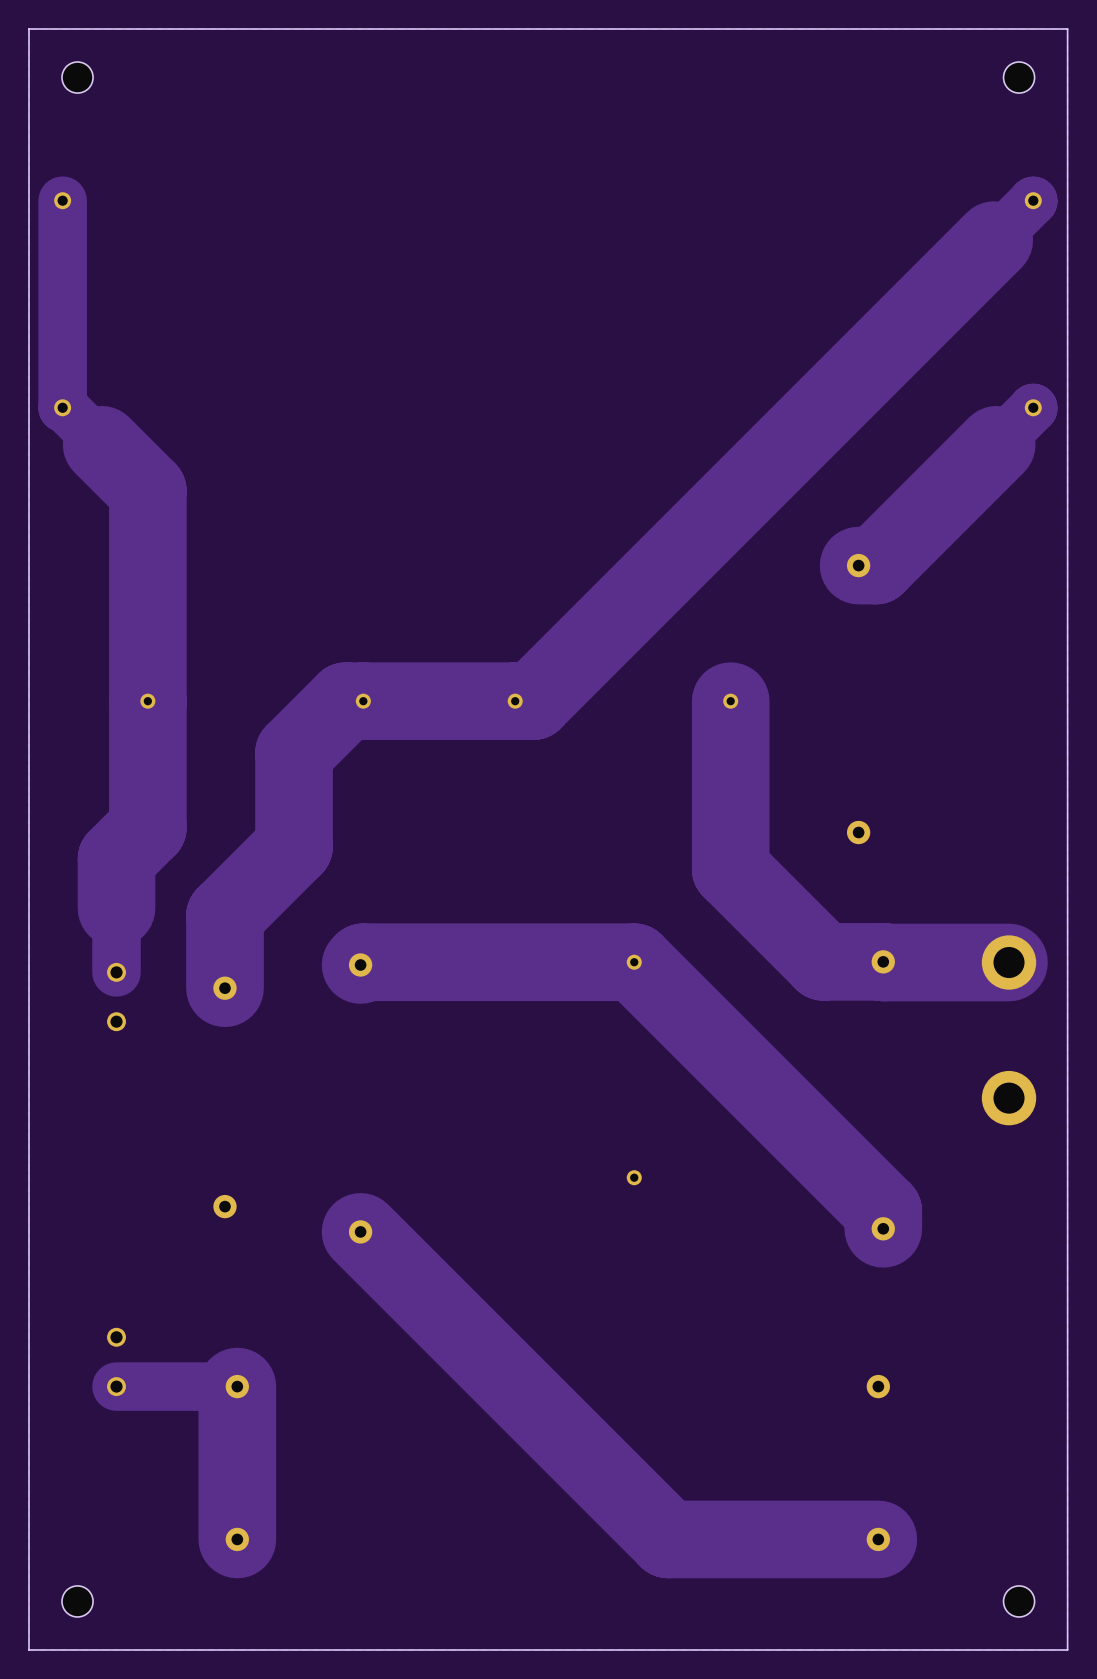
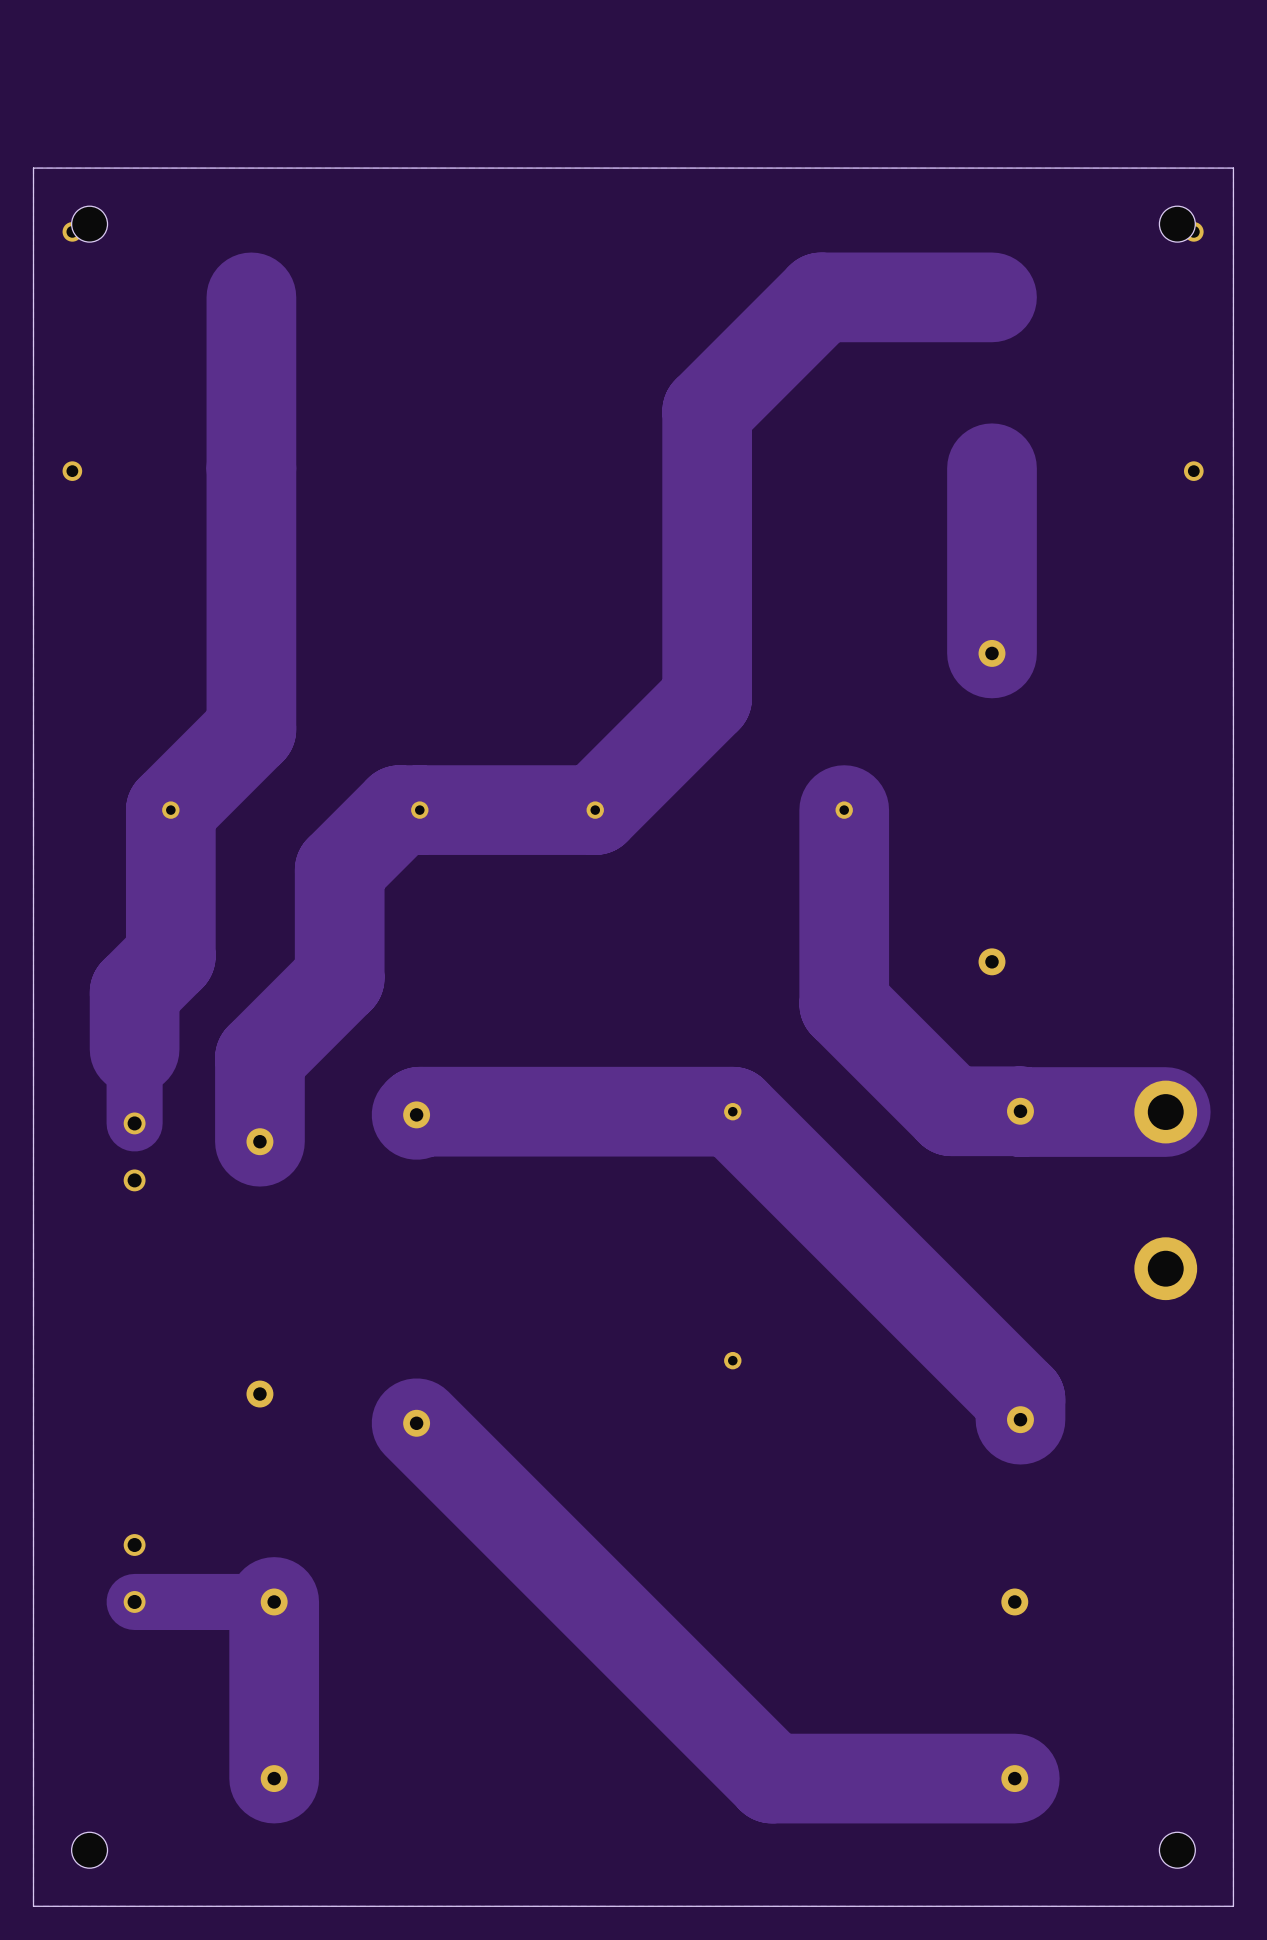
part position: (77, 77) -> (89, 224)
part position: (1019, 77) -> (1177, 224)
board edge: (1067, 145) (1067, 28) (28, 28) (28, 145) -> (1233, 168) (33, 168)
track: (62, 200) (62, 407) (147, 490) (147, 701) -> (251, 297) (251, 729) (170, 810)
track: (1033, 200) (533, 701) (515, 701) -> (991, 297) (821, 297) (707, 411) (707, 698) (595, 810)
track: (1033, 407) (875, 565) (858, 565) -> (991, 468) (991, 653)

